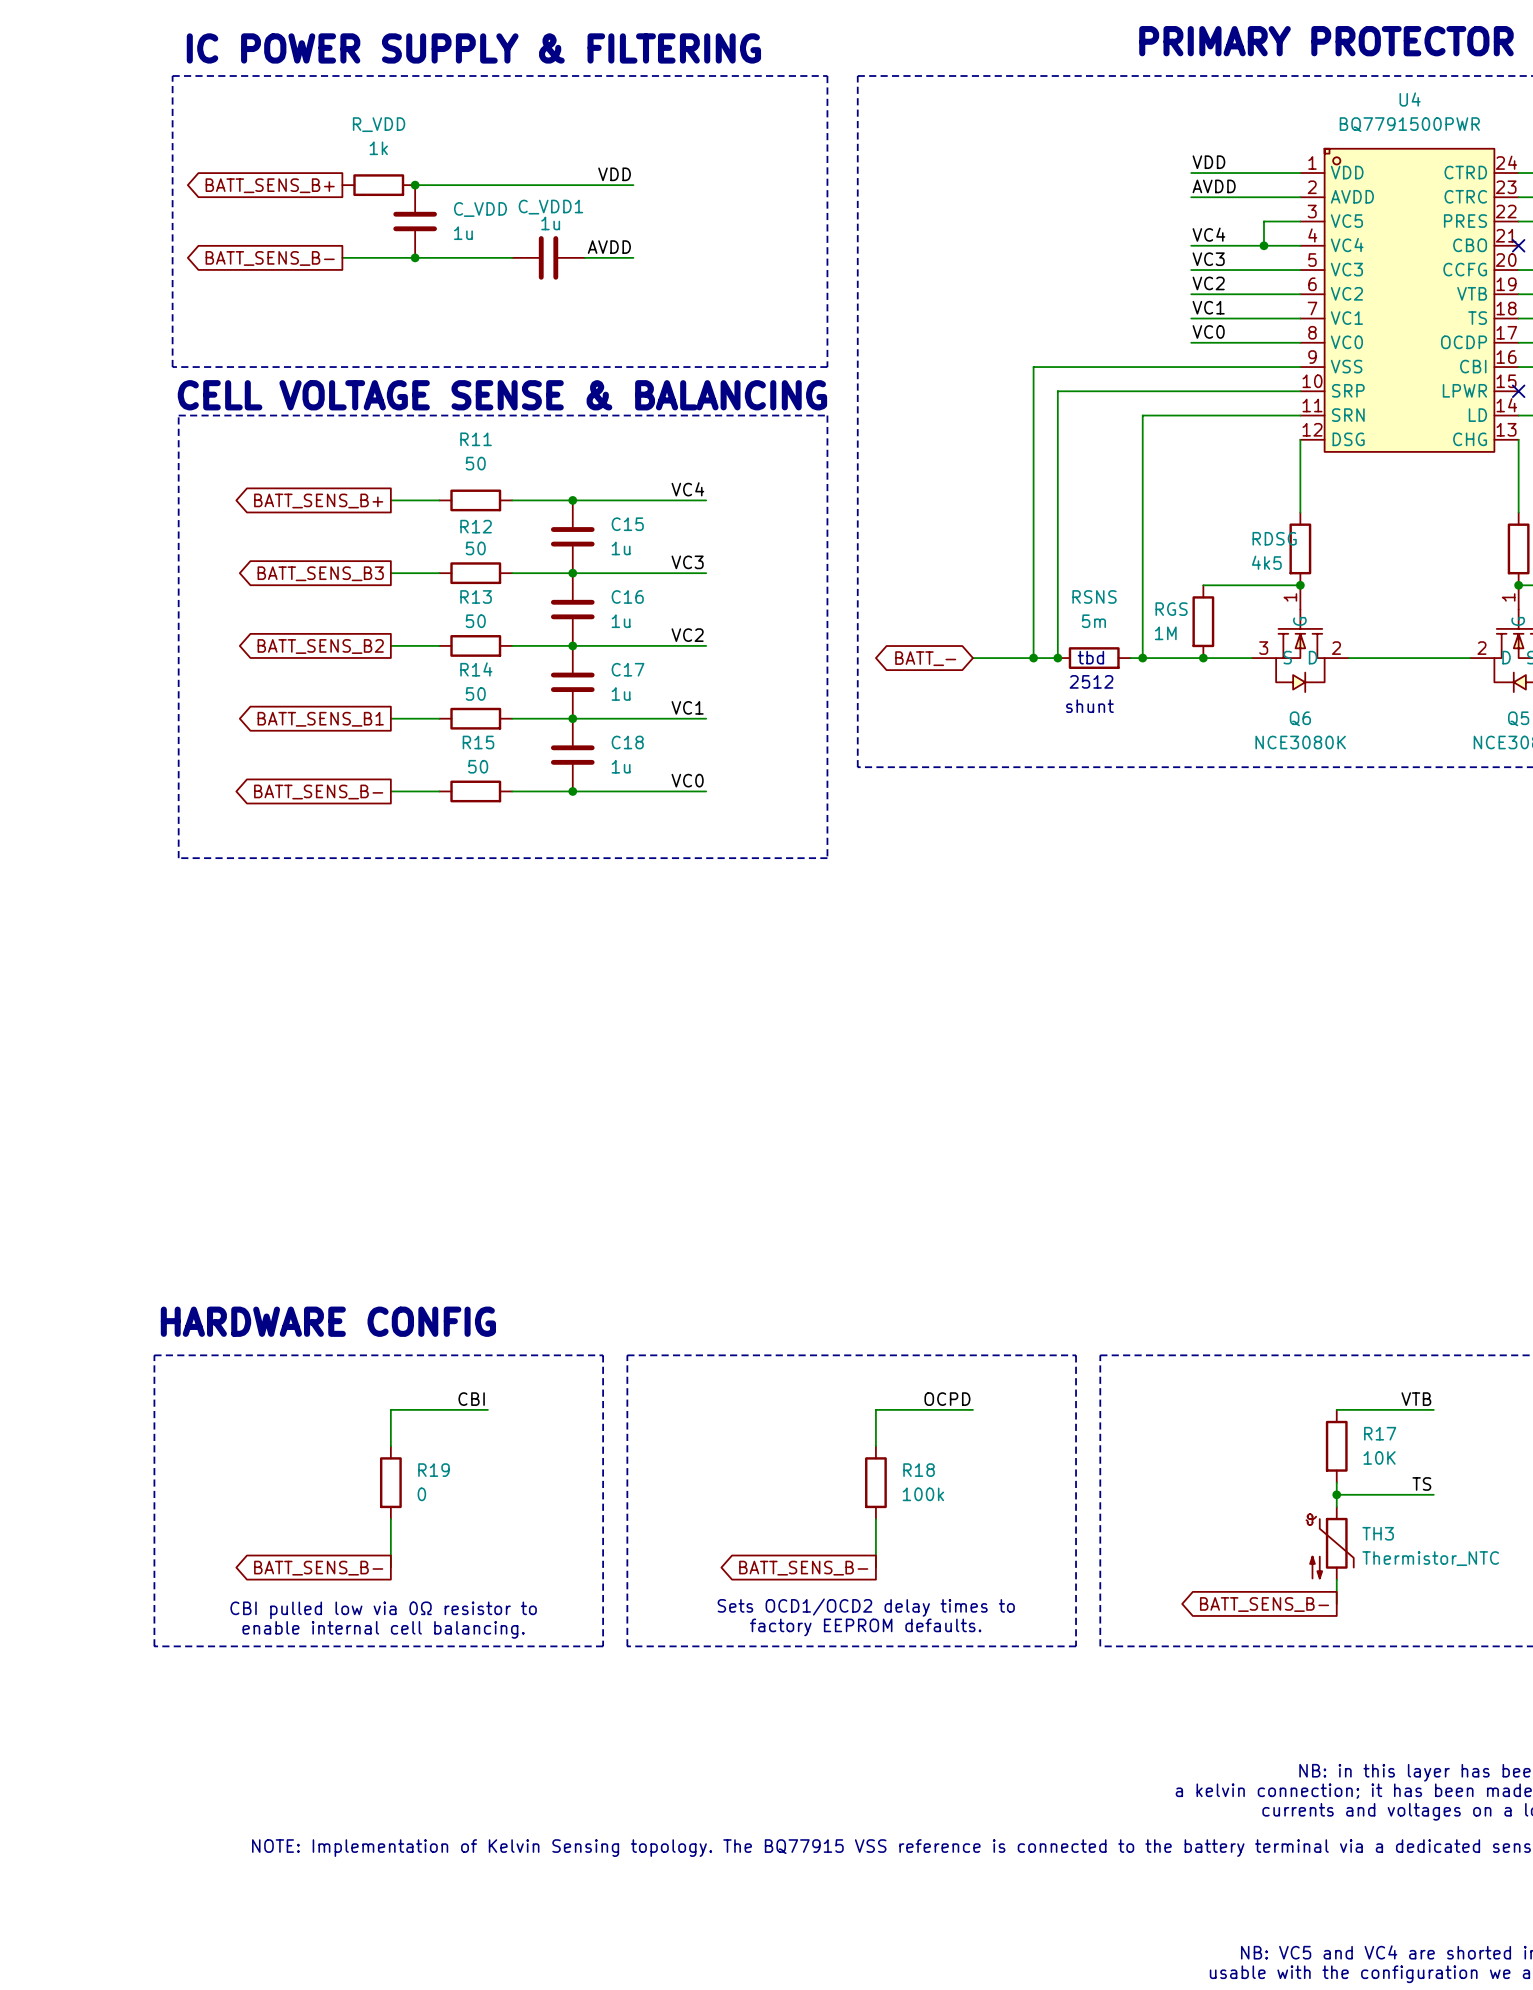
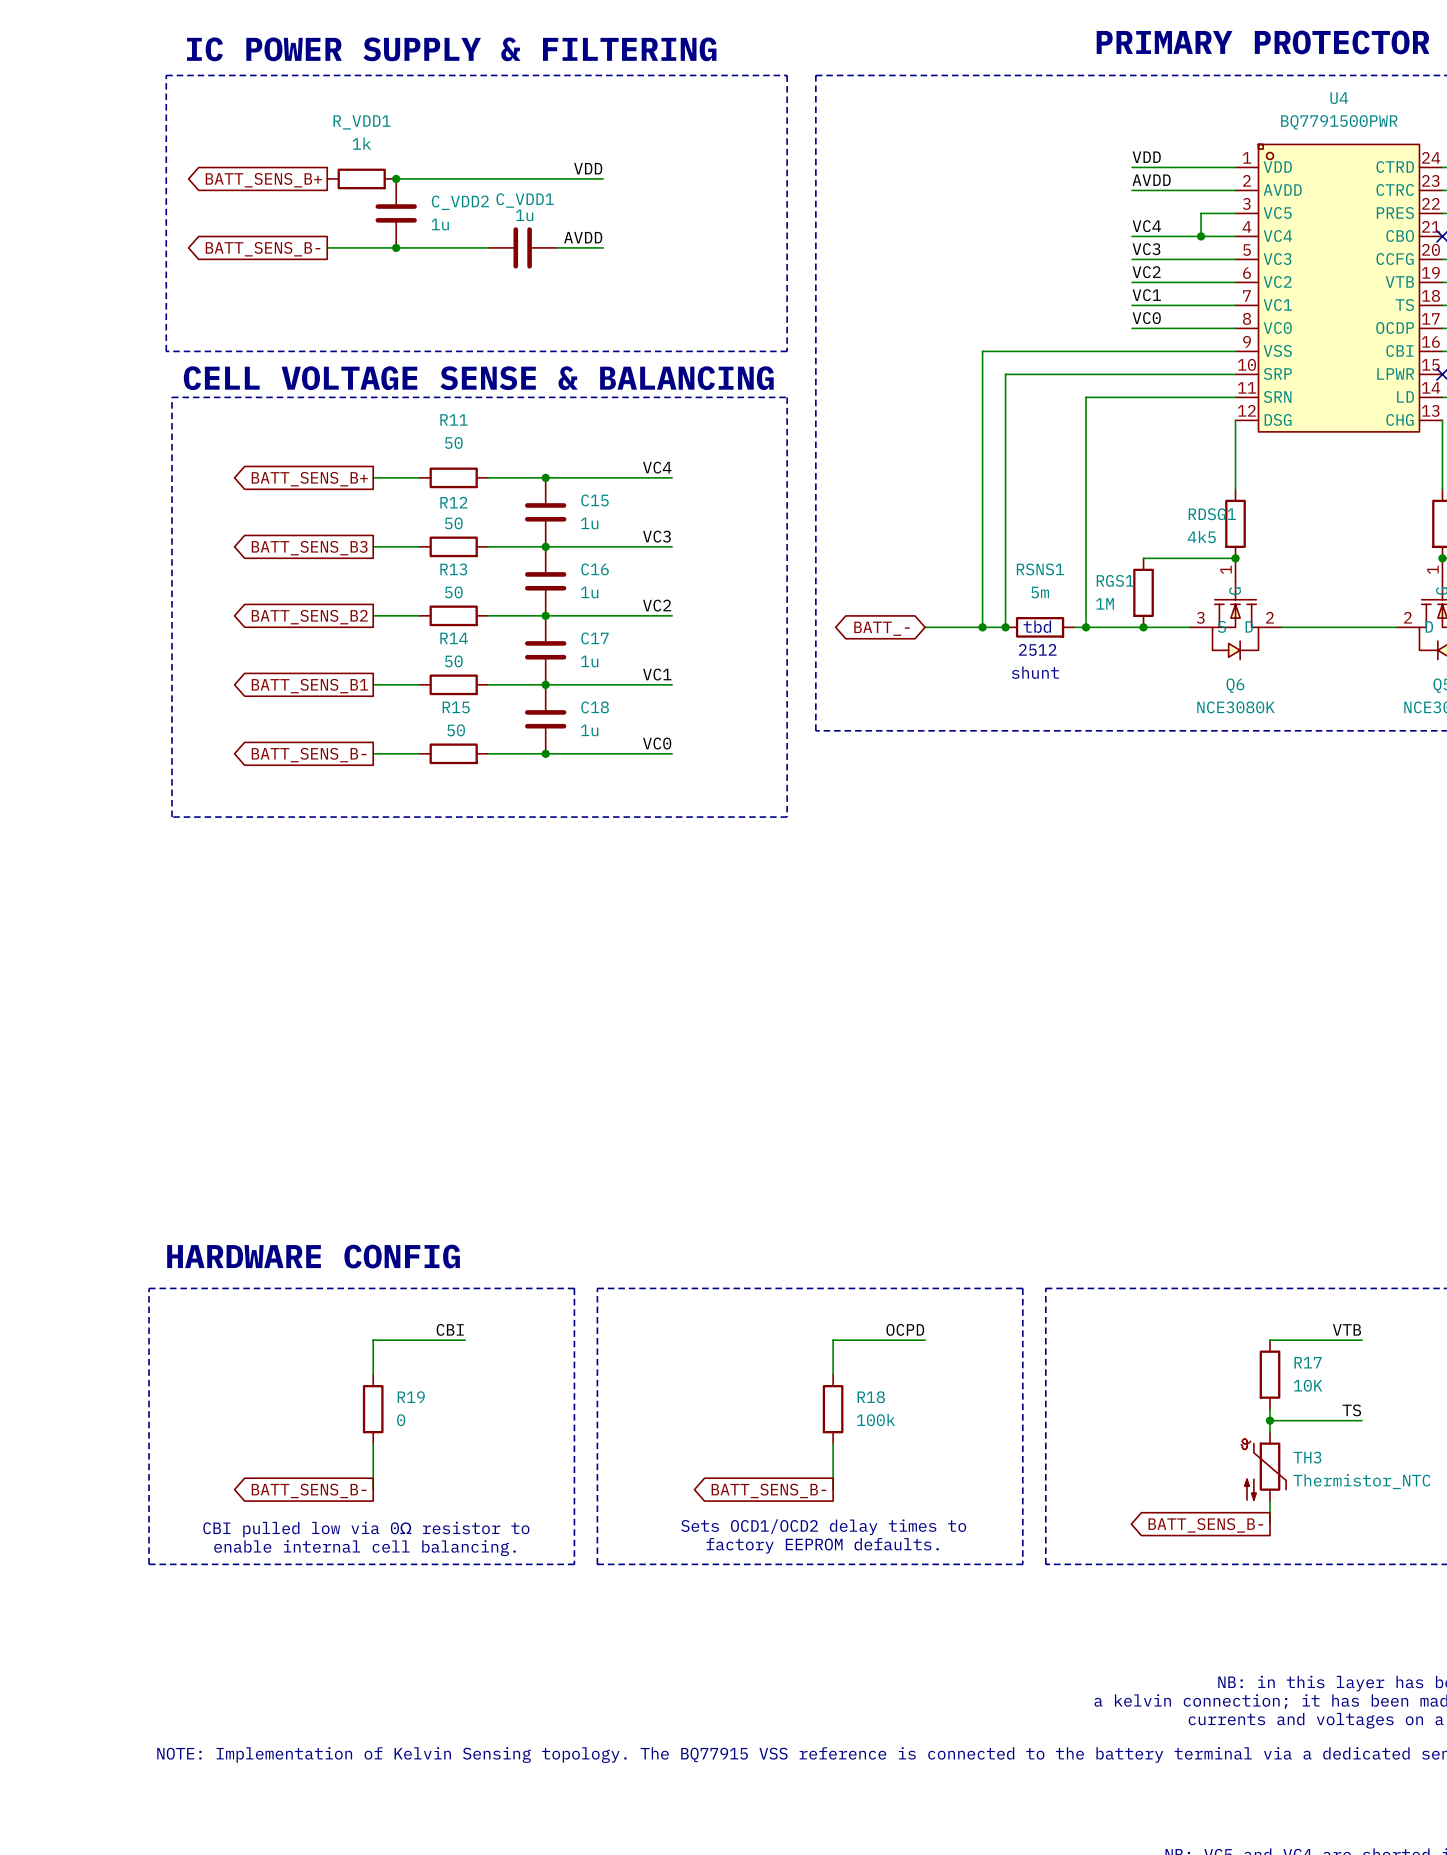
R_VDD name: R_VDD (379, 124) -> R_VDD1 (362, 122)
C_VDD name: C_VDD (480, 209) -> C_VDD2 (460, 202)
RDSG name: RDSG (1274, 538) -> RDSG1 (1212, 514)
RSNS name: RSNS (1094, 596) -> RSNS1 (1040, 569)
RGS name: RGS (1171, 609) -> RGS1 (1115, 580)

